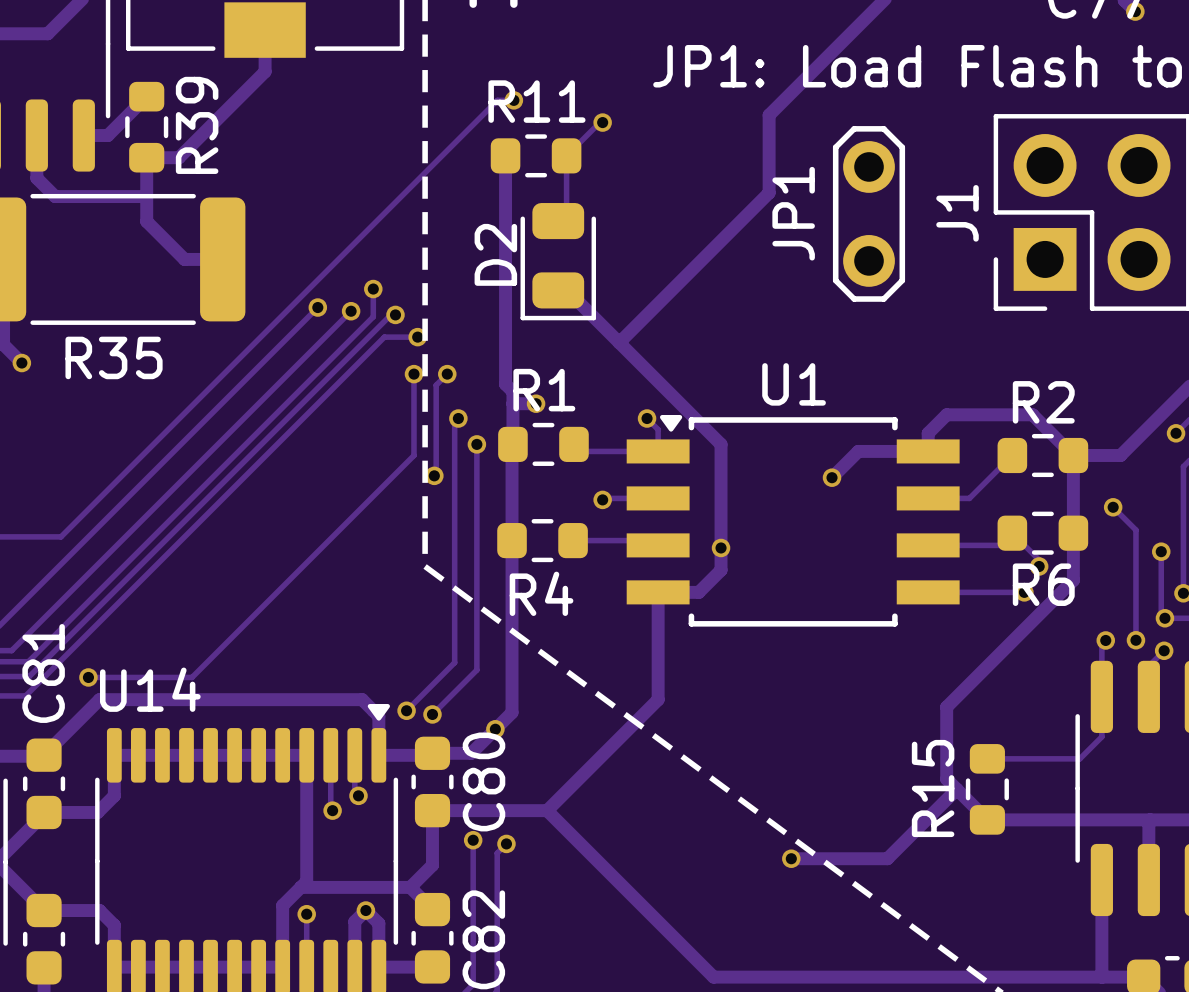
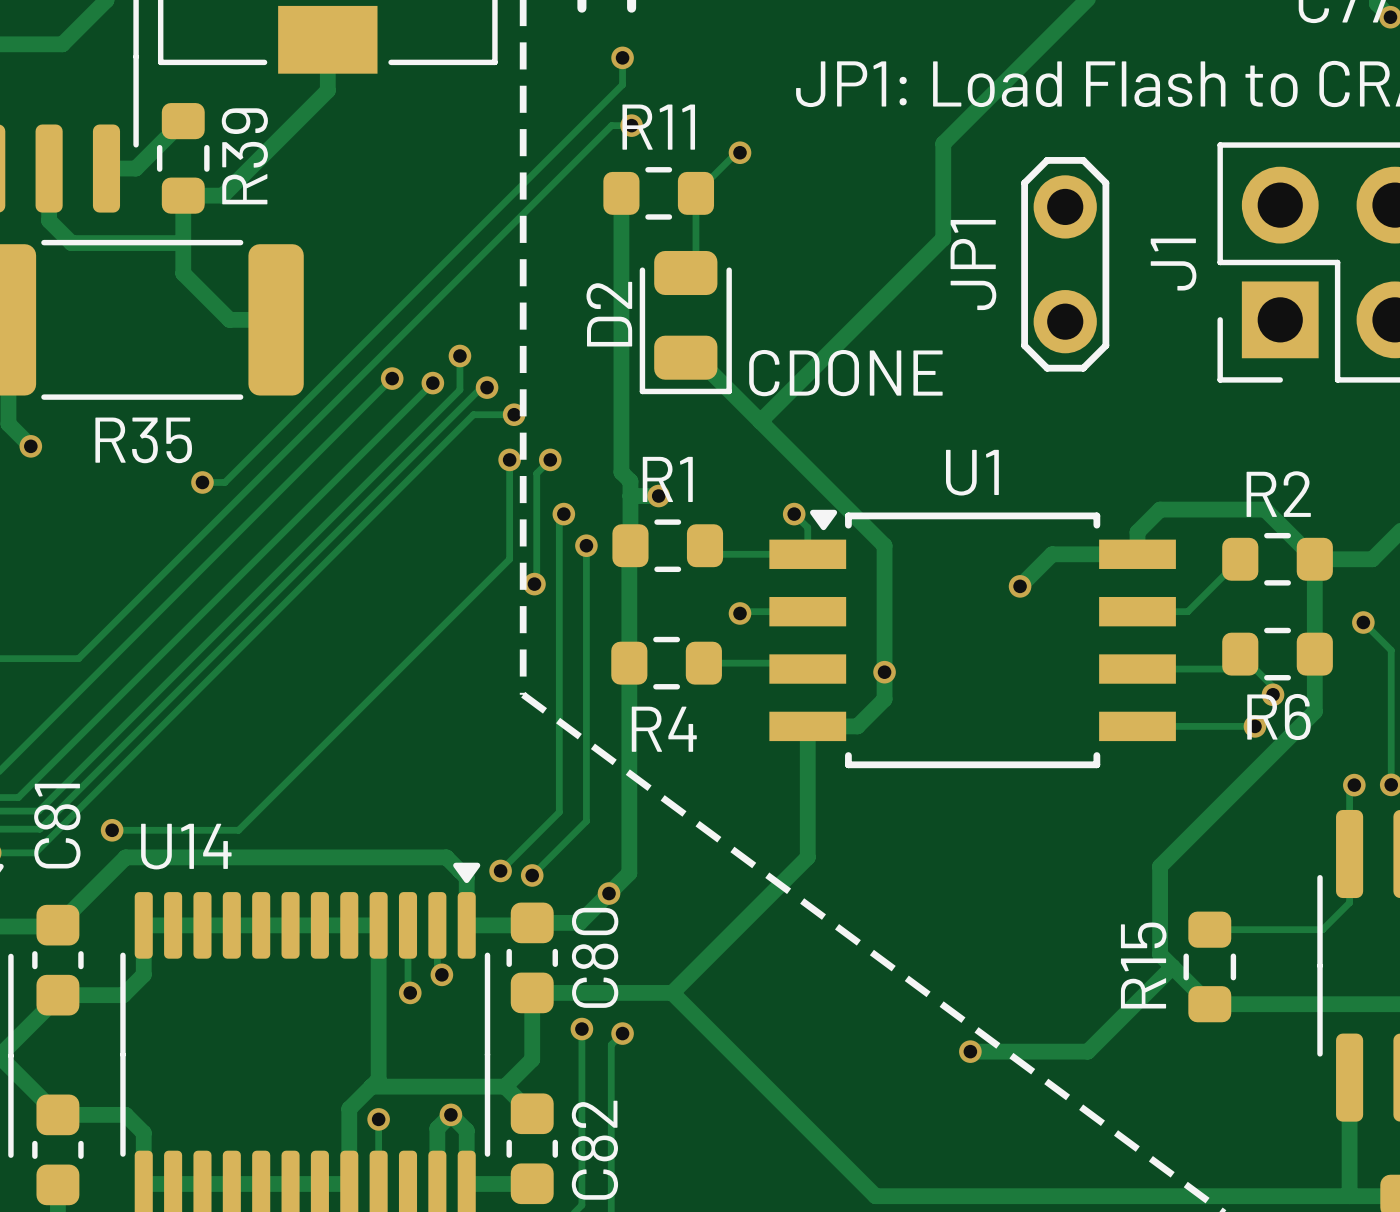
track: none -> (622, 57) (622, 84) (224, 482) (202, 482)
via: none -> (622, 57)
text: none -> CDONE (845, 373)
via: none -> (202, 482)

